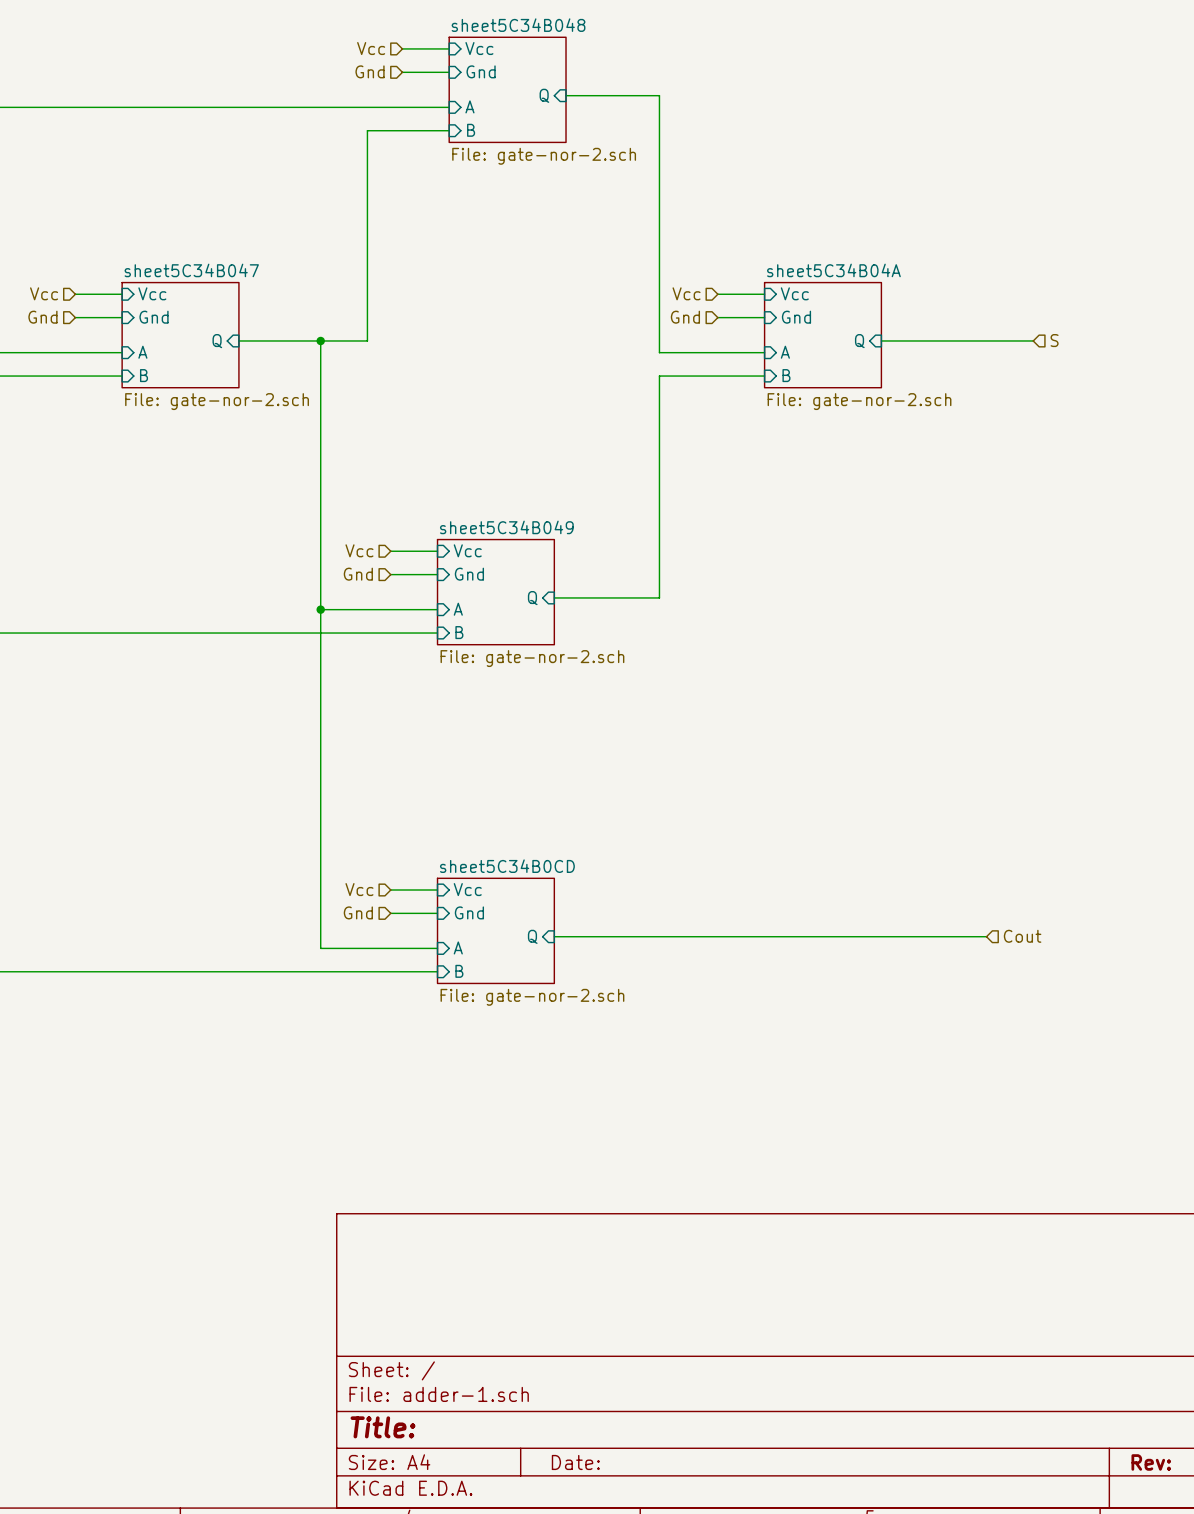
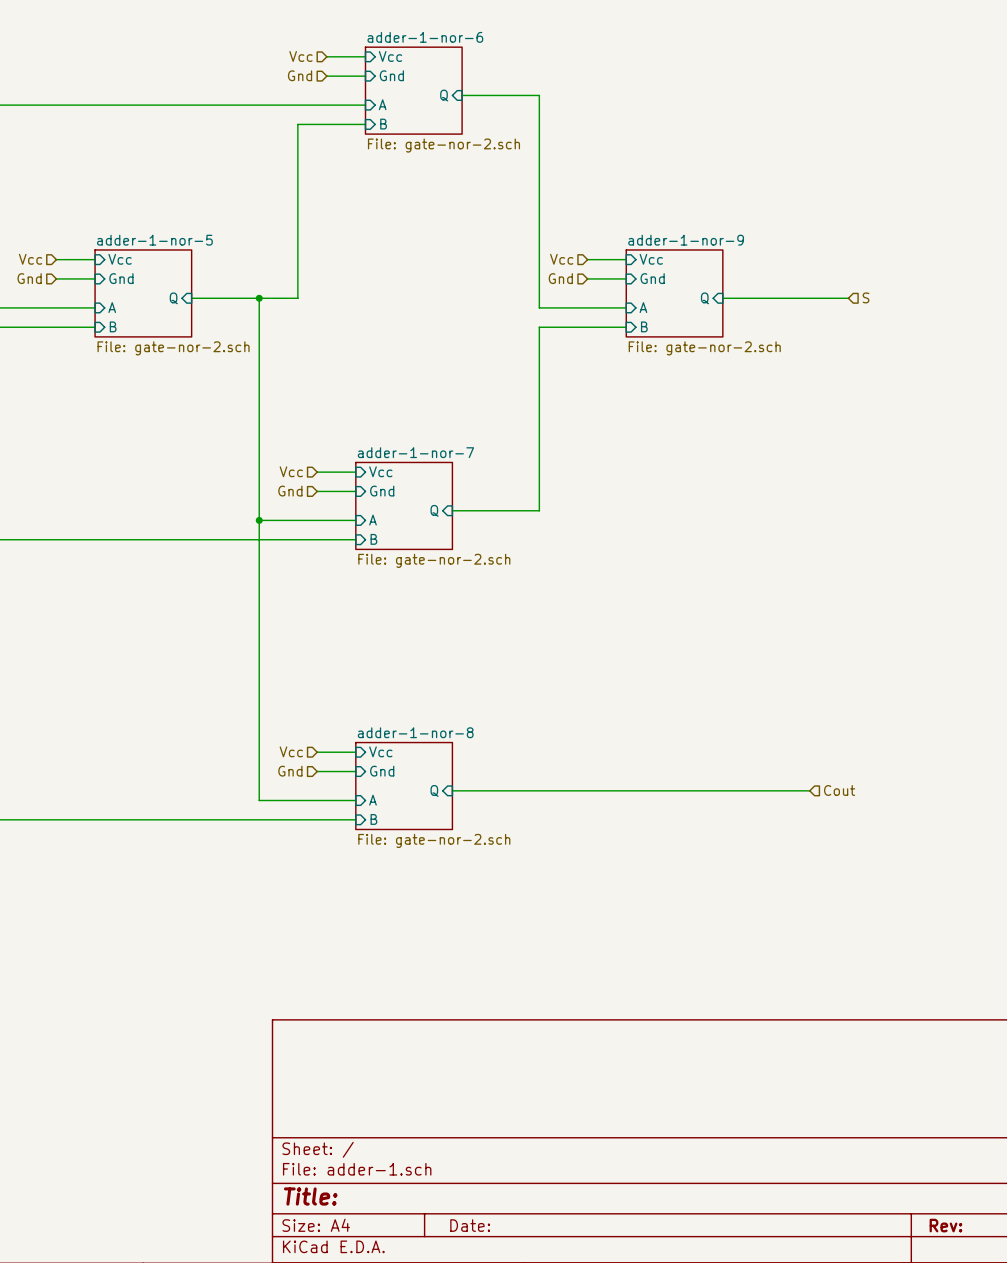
sheet sheet5C34B048 name: sheet5C34B048 (518, 25) -> adder-1-nor-6 (425, 37)
sheet sheet5C34B047 name: sheet5C34B047 (191, 270) -> adder-1-nor-5 (154, 240)
sheet sheet5C34B04A name: sheet5C34B04A (833, 270) -> adder-1-nor-9 (686, 240)
sheet sheet5C34B049 name: sheet5C34B049 (506, 527) -> adder-1-nor-7 (415, 452)
sheet sheet5C34B0CD name: sheet5C34B0CD (507, 866) -> adder-1-nor-8 (415, 732)

